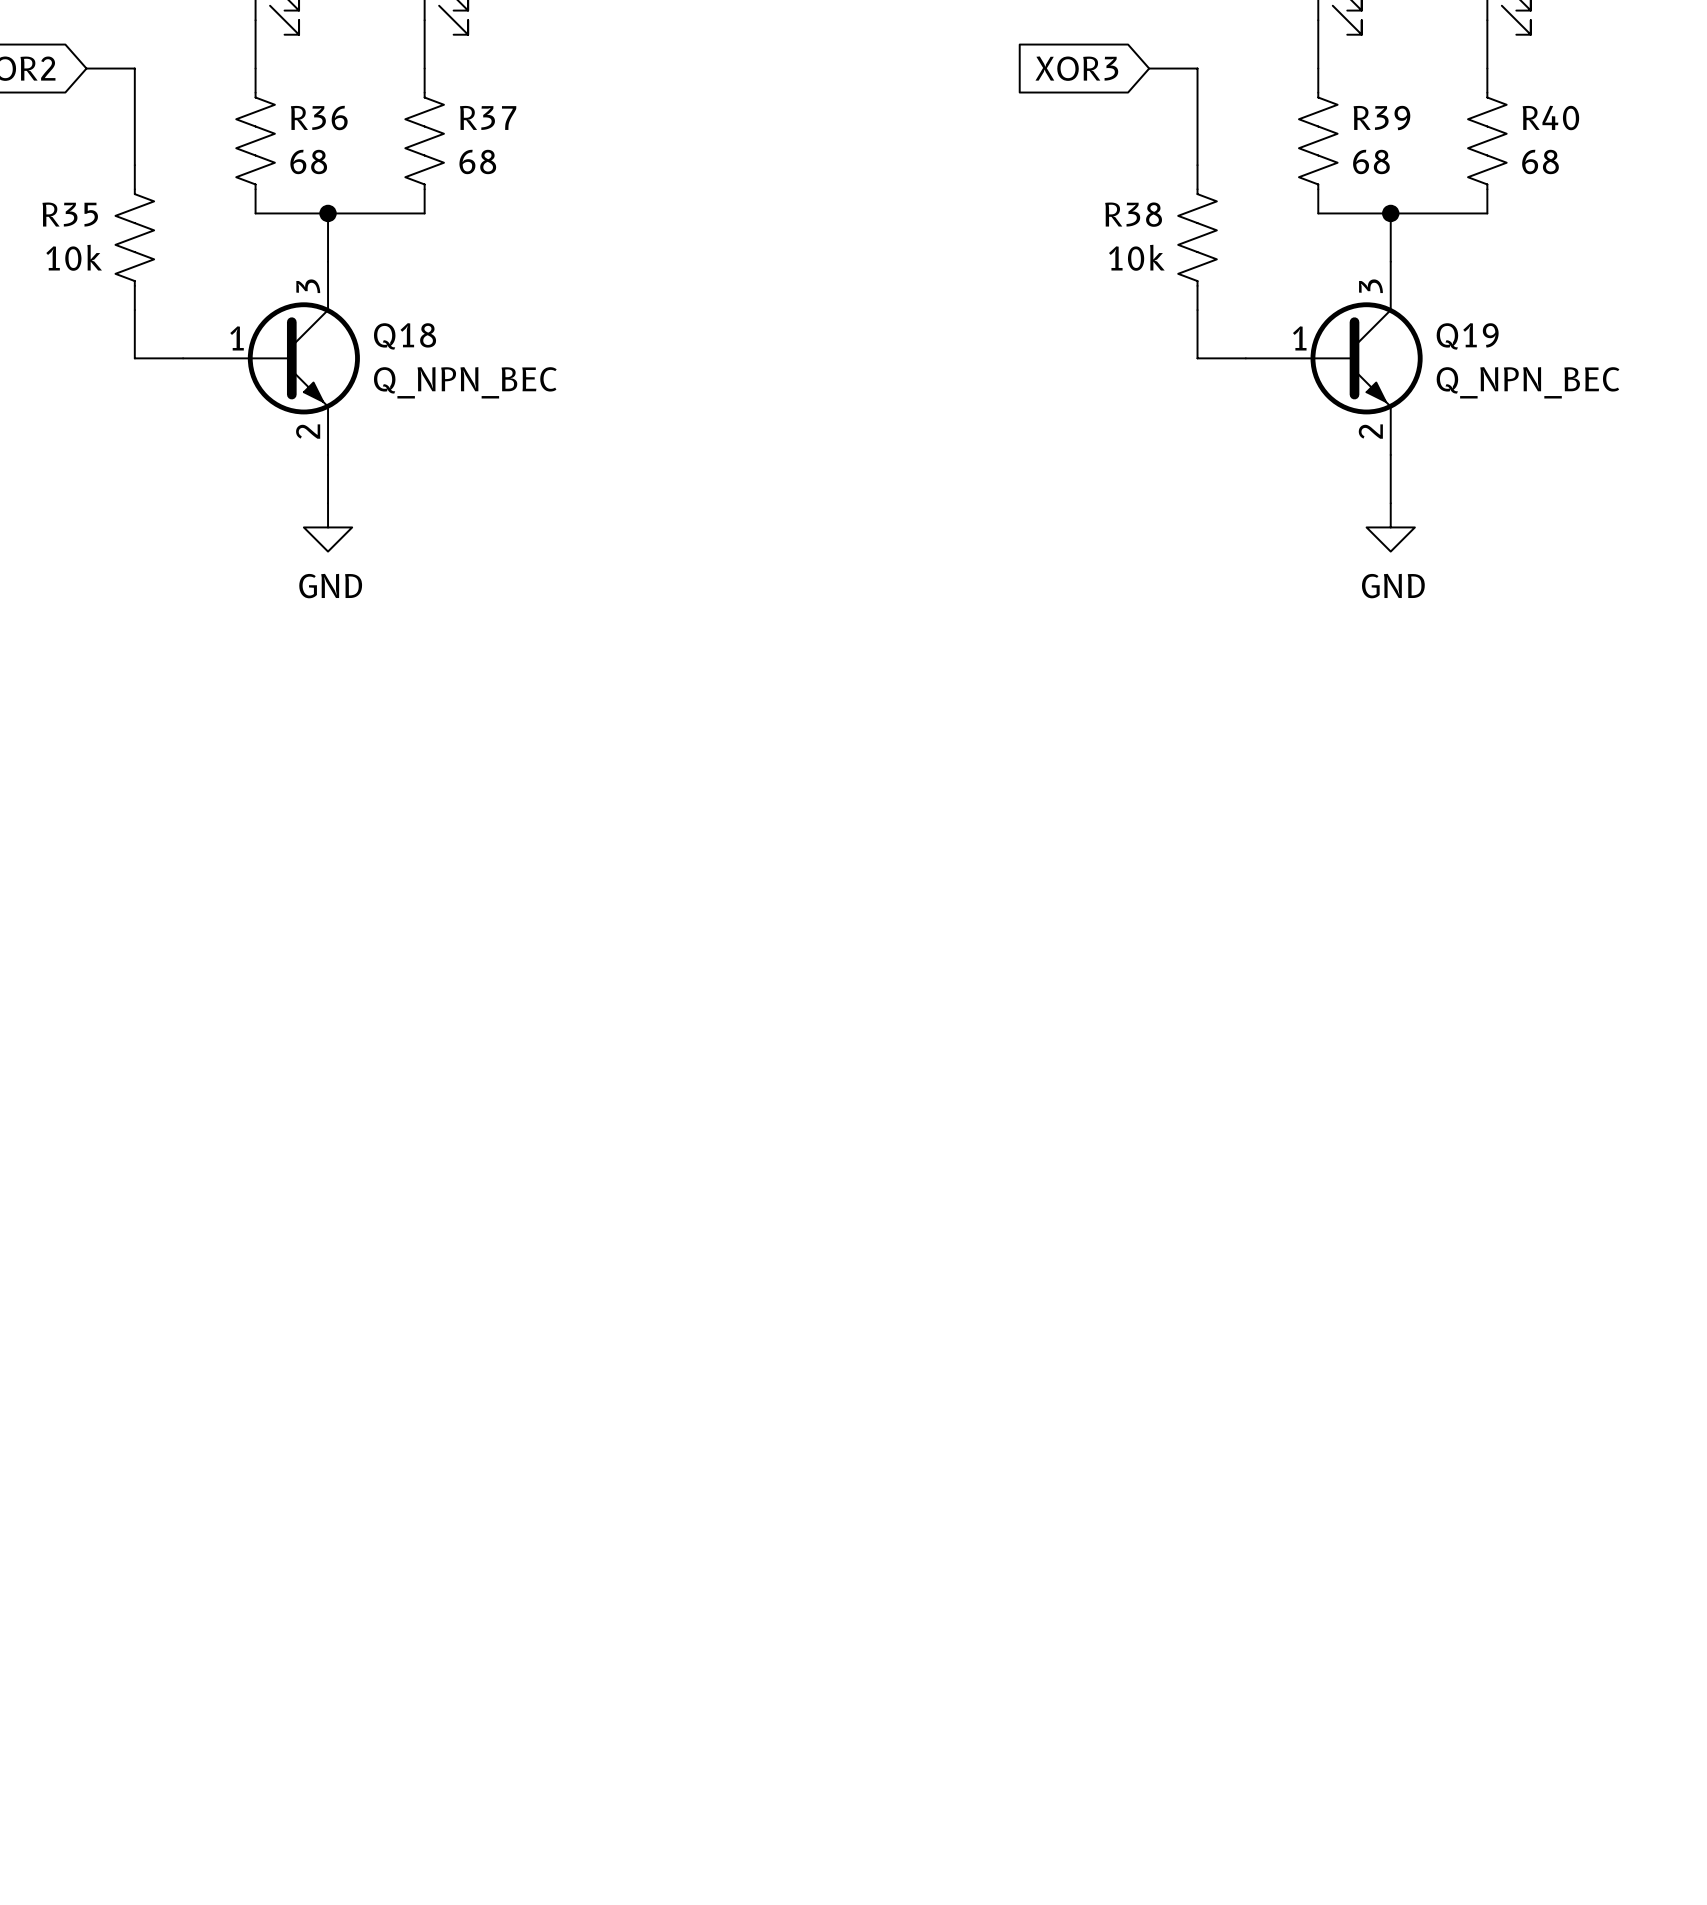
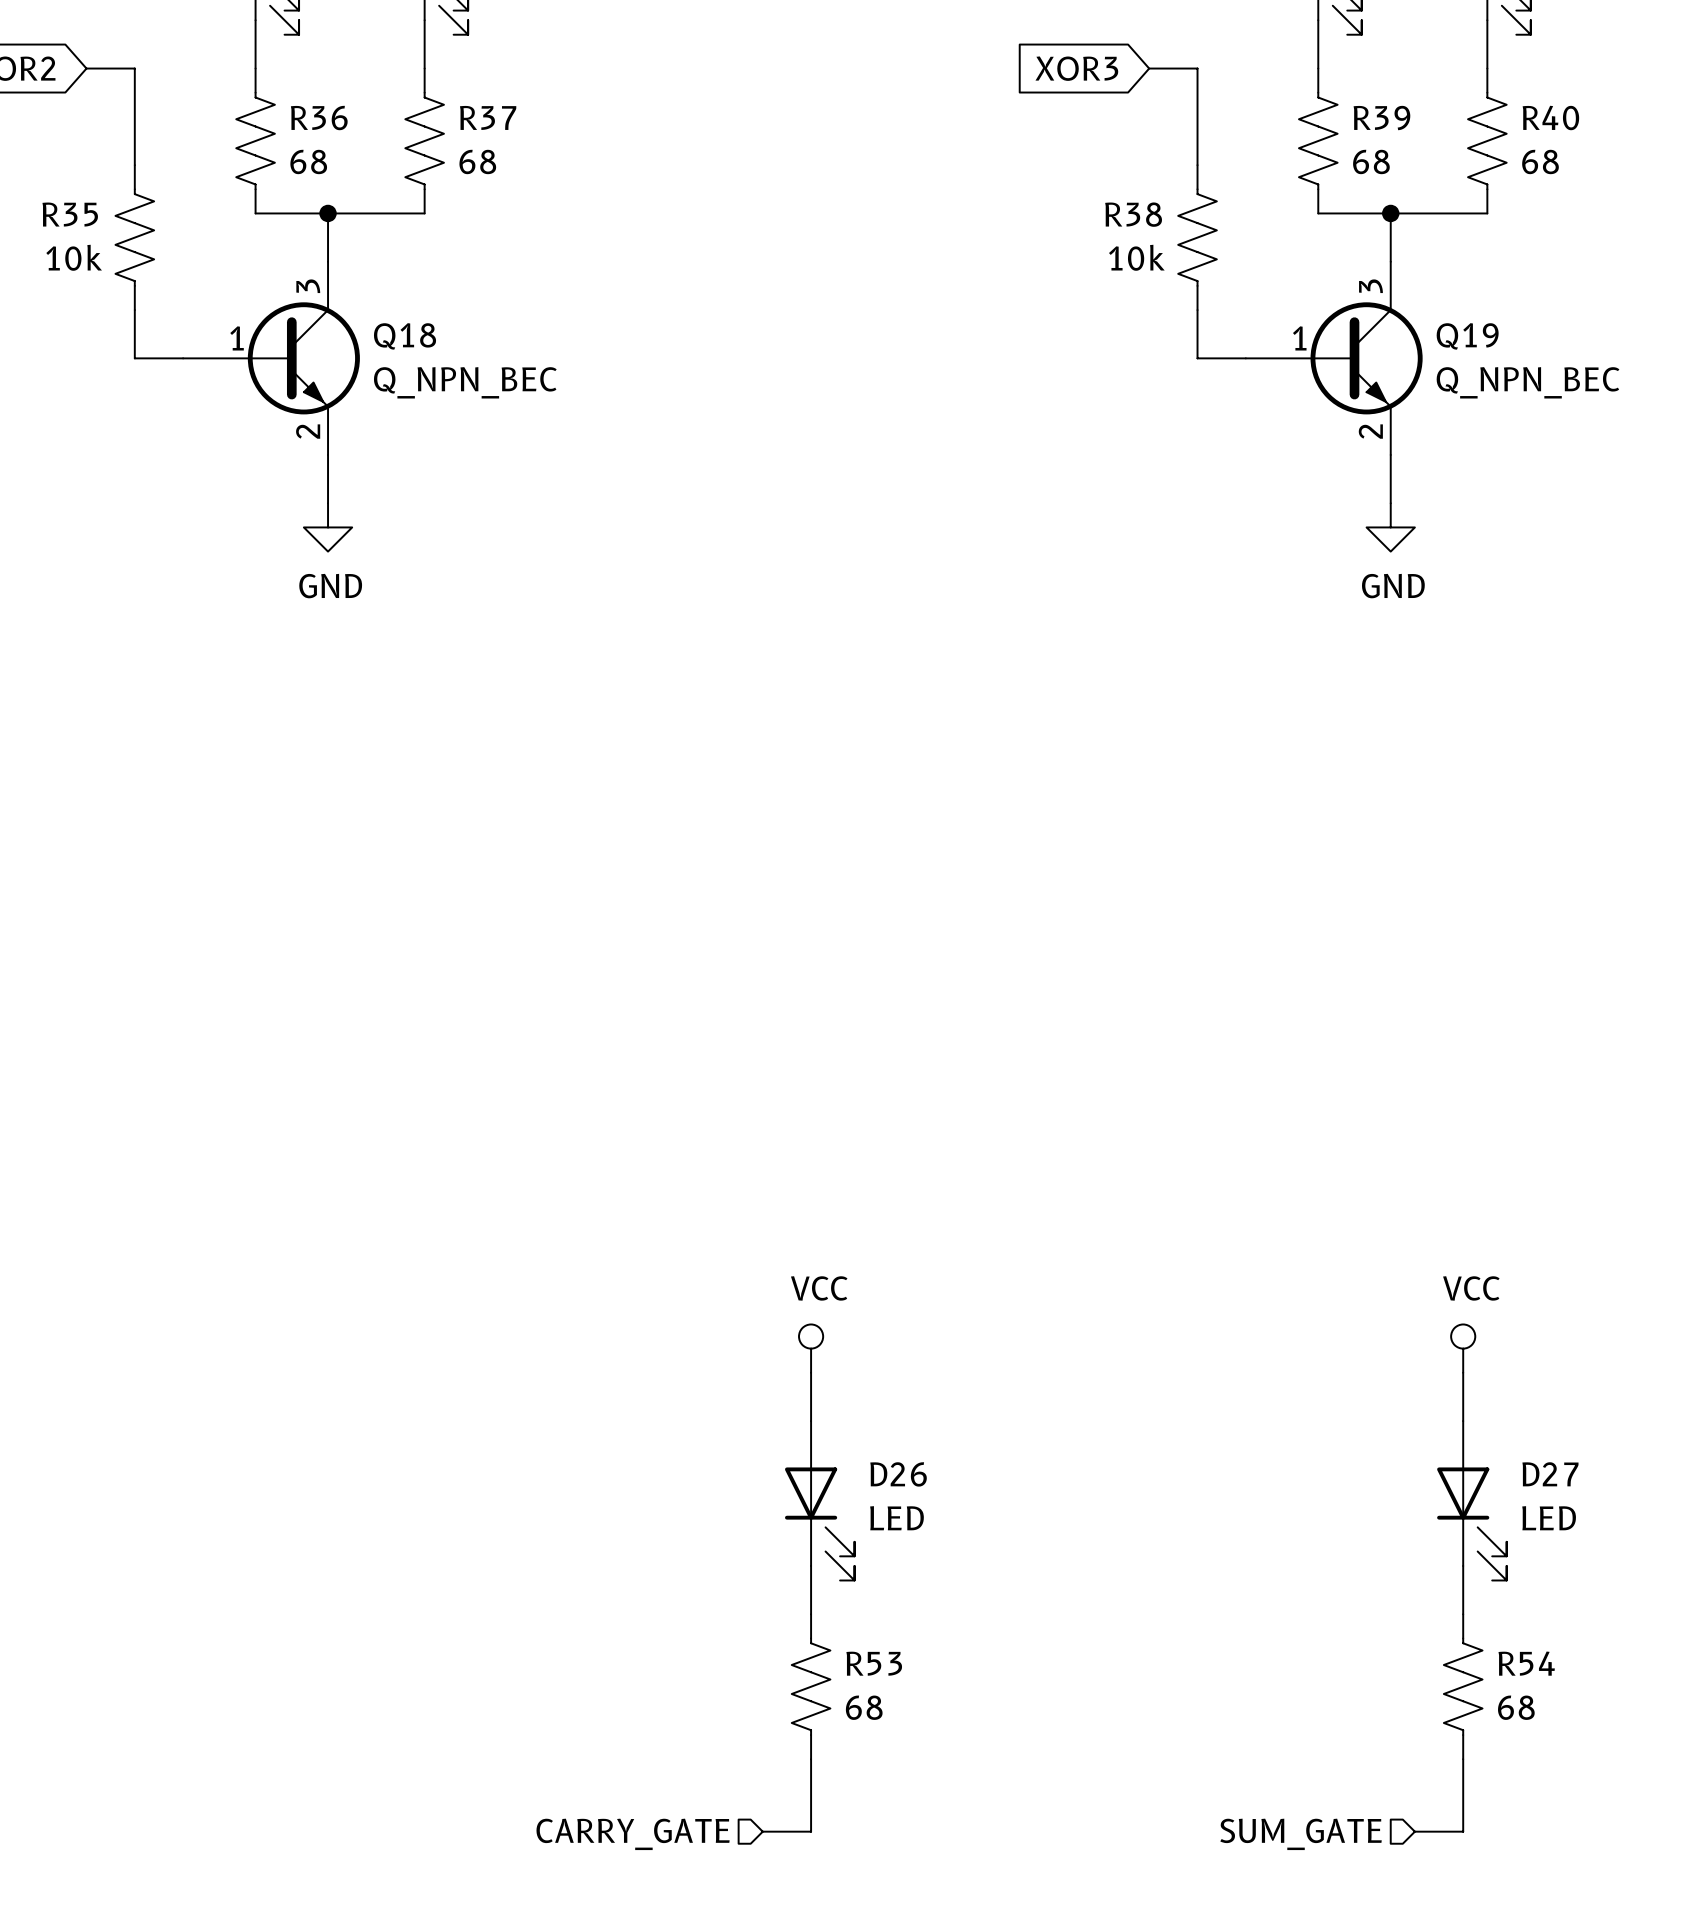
power symbol: none -> VCC (811, 1348)
power symbol: none -> VCC (1463, 1348)
wire: none -> (811, 1372) (811, 1421)
wire: none -> (1463, 1372) (1463, 1421)
D26: none -> LED (819, 1500)
D27: none -> LED (1471, 1500)
wire: none -> (811, 1565) (811, 1614)
wire: none -> (1463, 1565) (1463, 1614)
R53: none -> 68 (811, 1686)
R54: none -> 68 (1463, 1686)
wire: none -> (811, 1759) (811, 1831) (762, 1831)
wire: none -> (1463, 1759) (1463, 1831) (1414, 1831)
hierarchical label: none -> CARRY_GATE (633, 1834)
hierarchical label: none -> SUM_GATE (1301, 1834)

